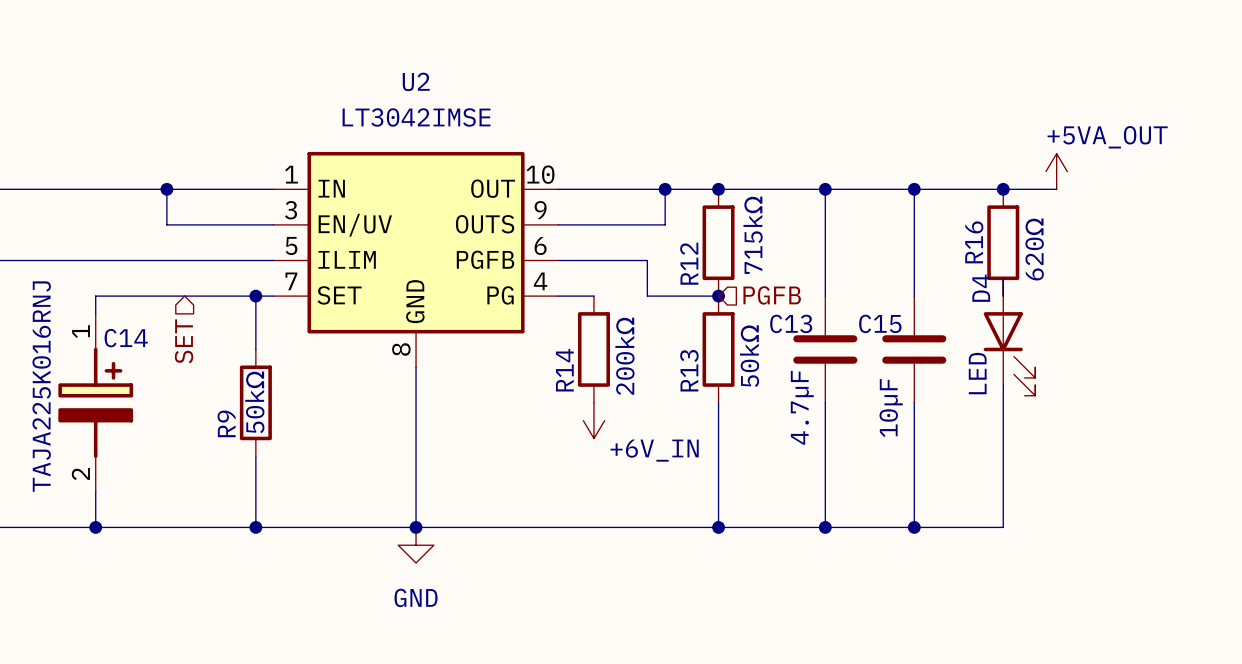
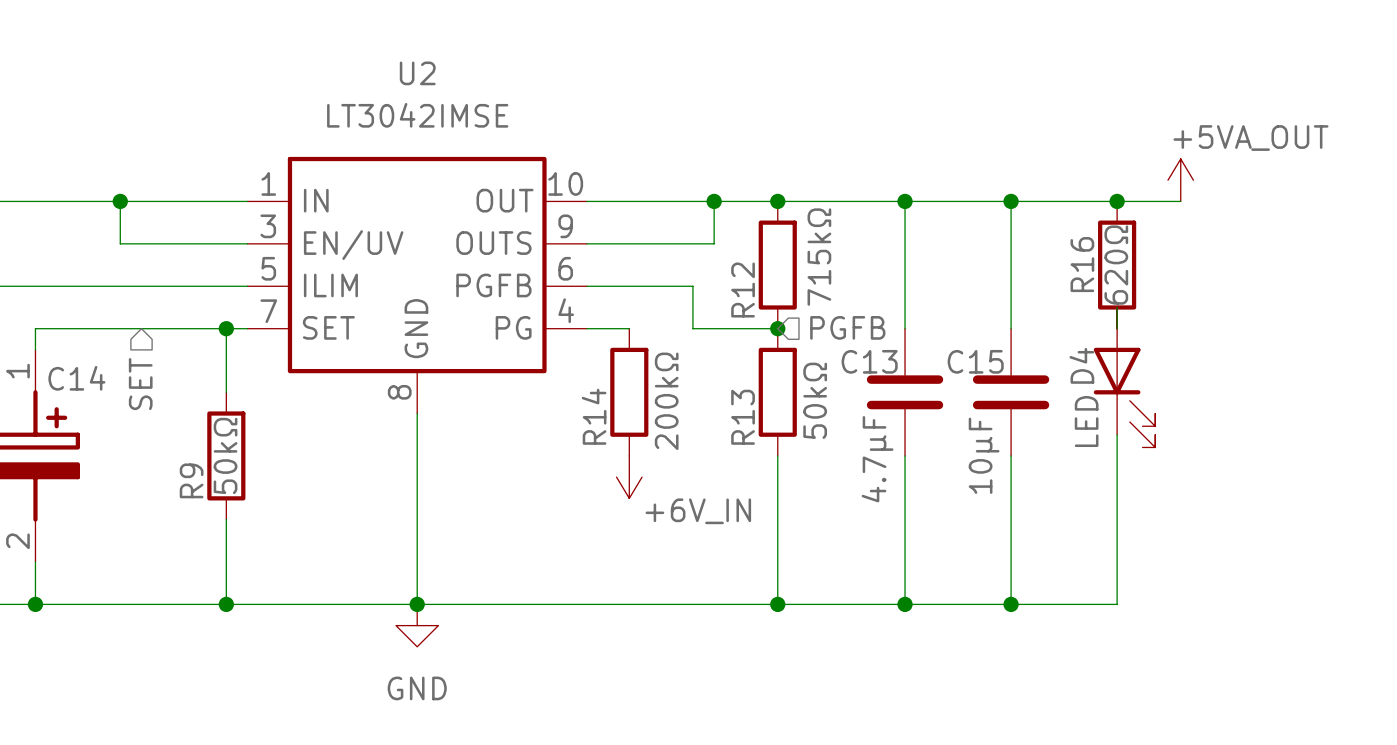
R16 value position: 620Ω (1034, 249) -> 620Ω (1116, 265)
D4 name position: D4 (981, 288) -> D4 (1081, 365)

